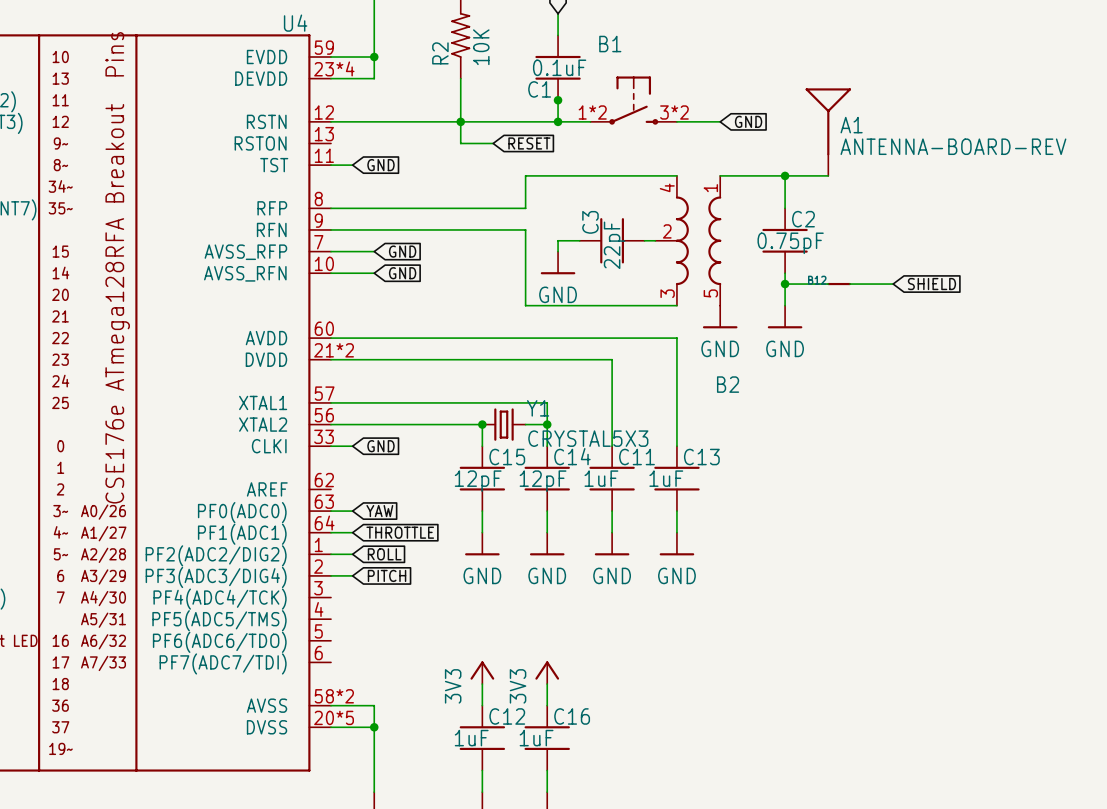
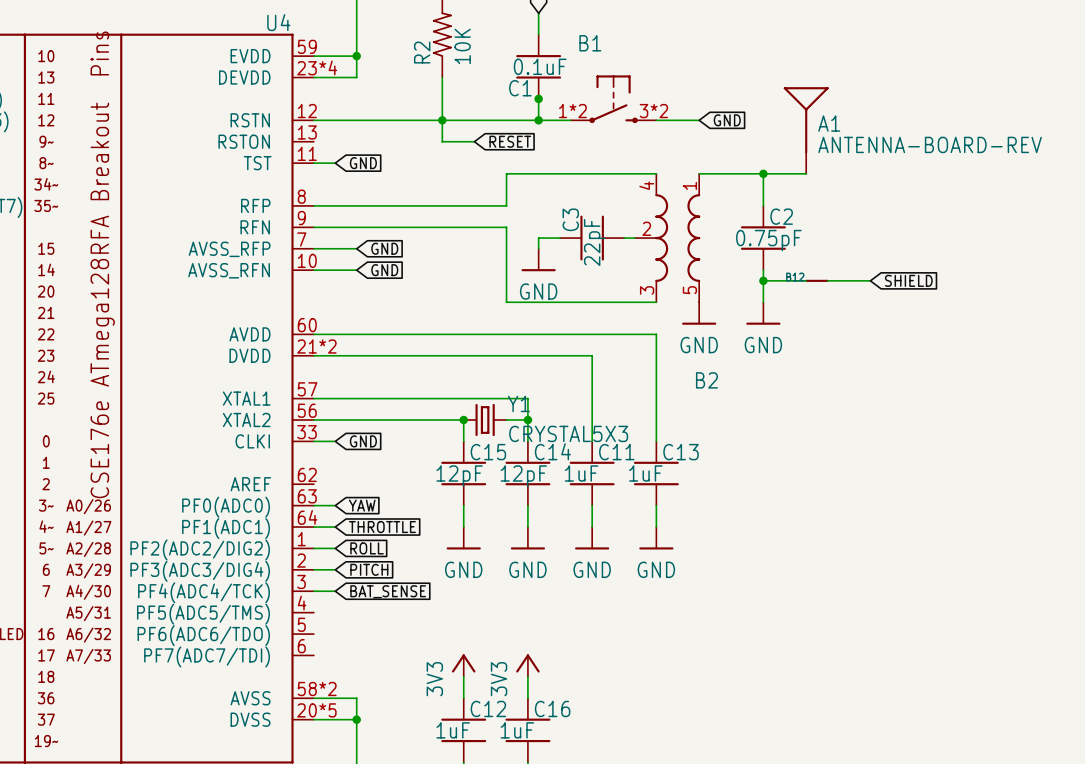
wire: none -> (313, 591) (335, 591)
global label: none -> BAT_SENSE (388, 591)

